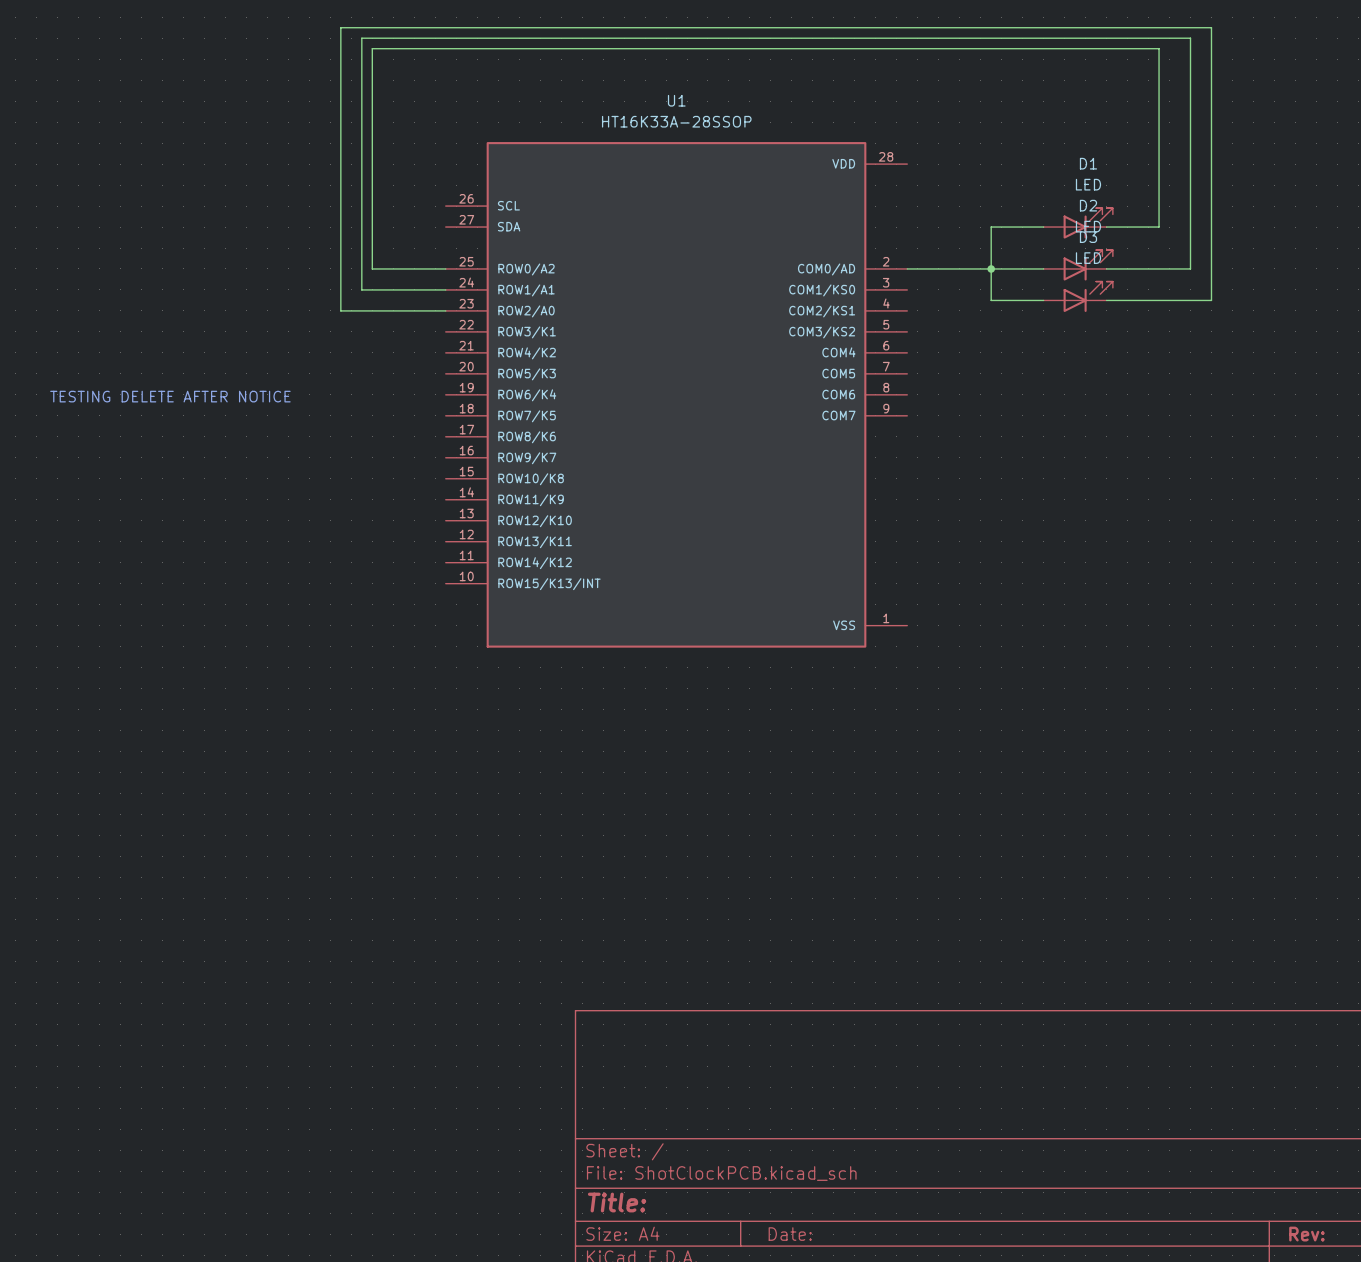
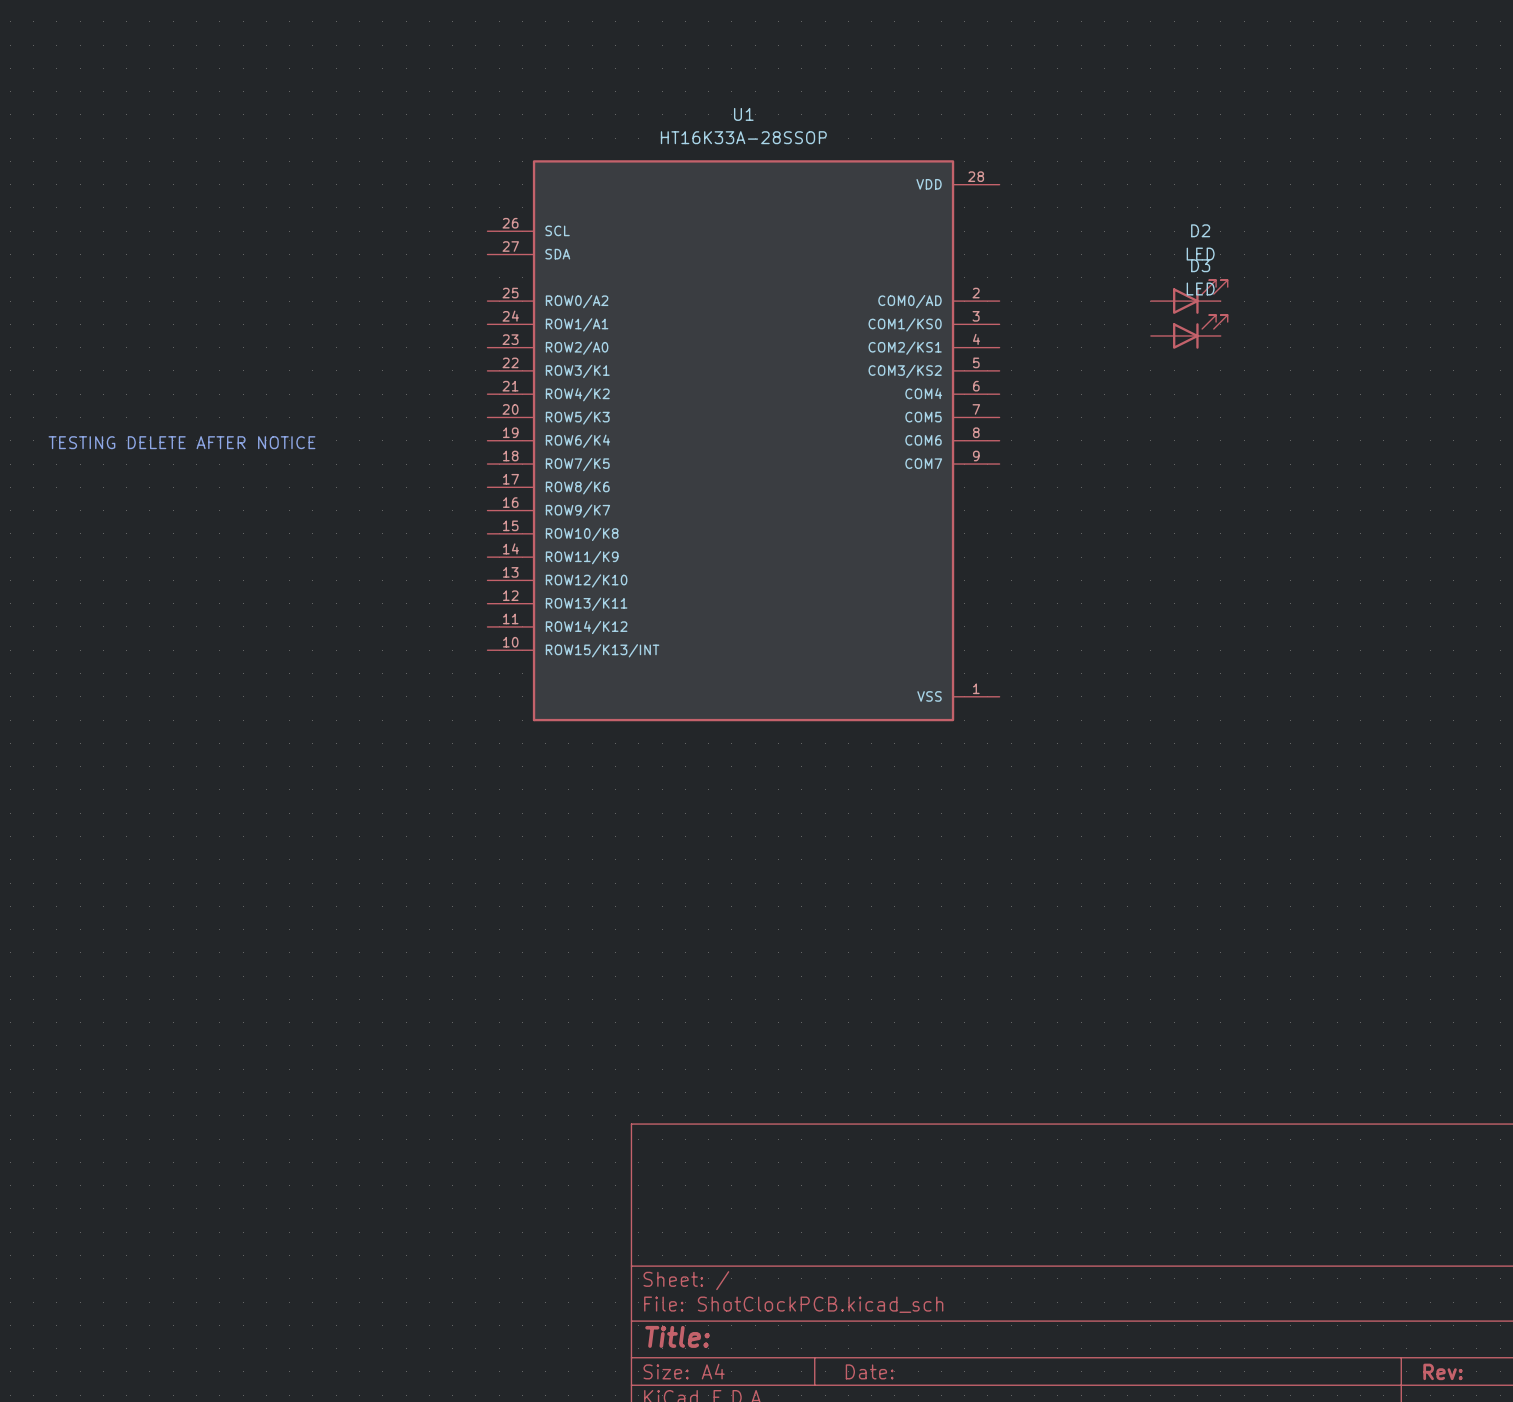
D1: LED (1078, 223) -> none
wire: (1043, 227) (991, 227) (991, 300) (1043, 300) -> none
wire: (1106, 227) (1159, 227) (1159, 48) (372, 48) (372, 268) (445, 268) -> none
wire: (907, 268) (1043, 268) -> none
junction: (991, 268) -> none
wire: (1106, 268) (1190, 268) (1190, 38) (361, 38) (361, 289) (445, 289) -> none
wire: (1106, 300) (1211, 300) (1211, 27) (340, 27) (340, 310) (445, 310) -> none

